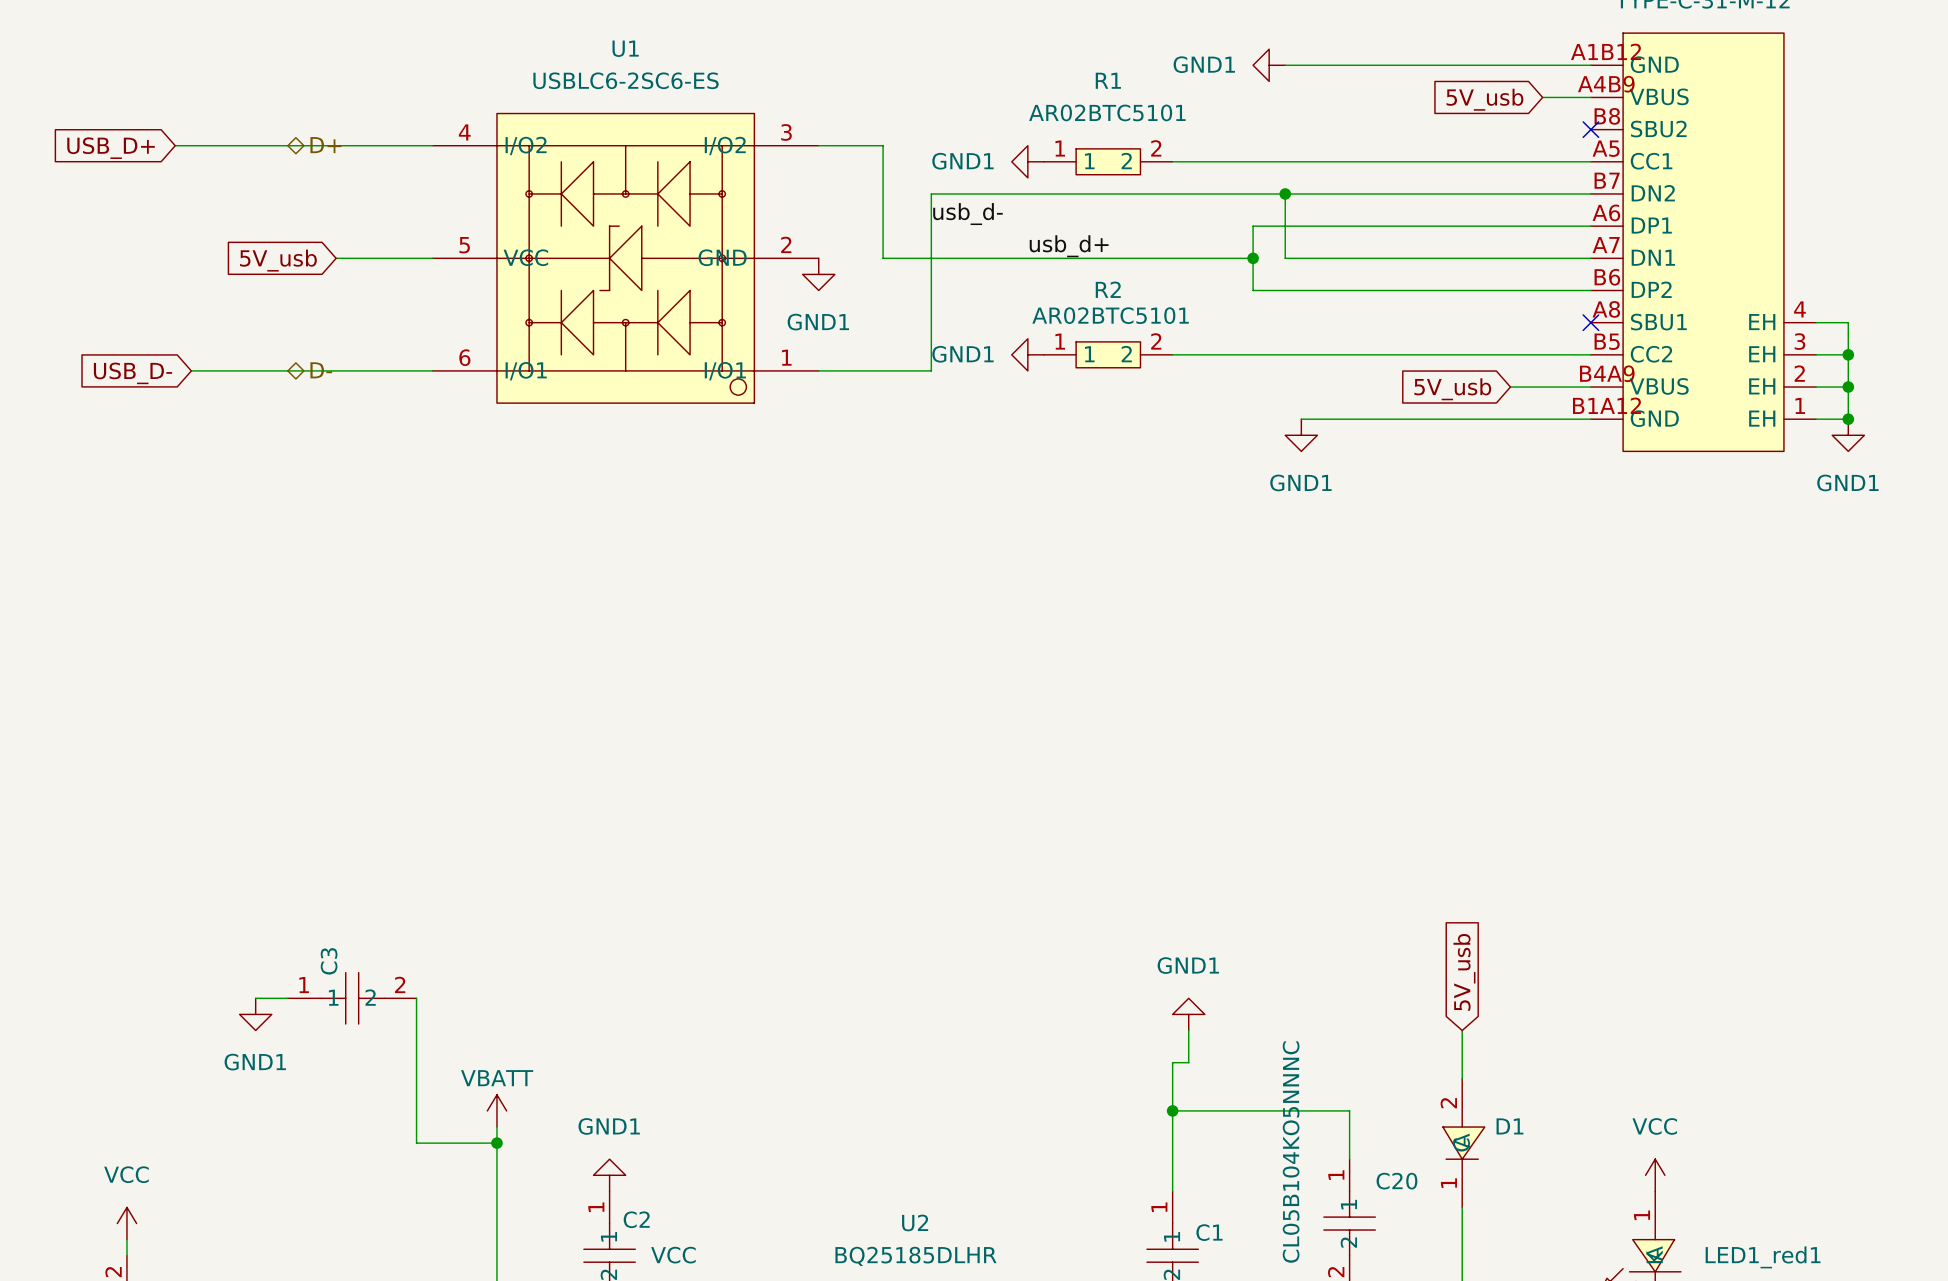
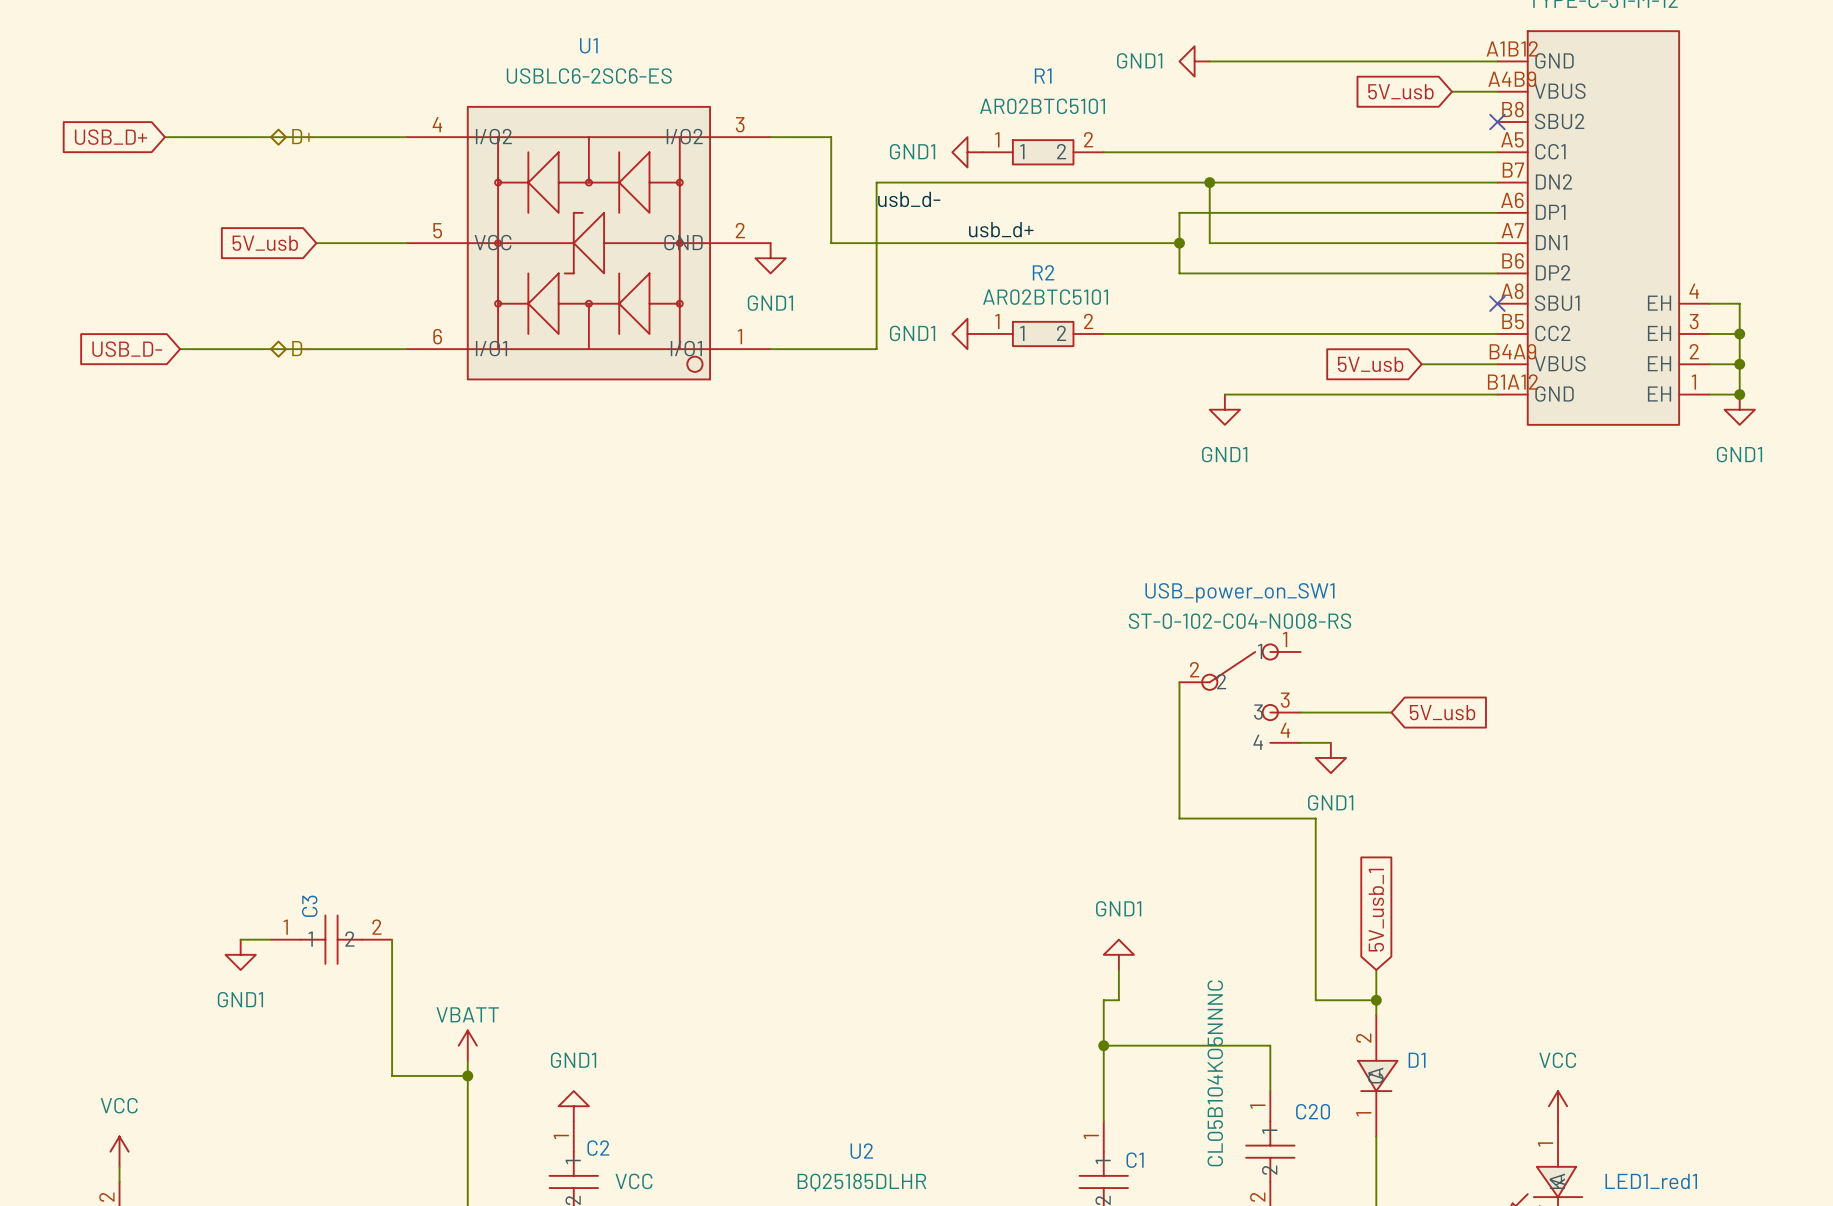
wire: none -> (1179, 682) (1179, 818) (1315, 818) (1315, 1000) (1376, 1000)
USB_power_on_SW1: none -> ST-0-102-C04-N008-RS (1240, 693)
wire: none -> (1300, 712) (1391, 712)
global label: none -> 5V_usb (1442, 712)
wire: none -> (1300, 742) (1330, 742)
power symbol: none -> GND1 (1330, 757)
global label: 5V_usb (1464, 972) -> 5V_usb_1 (1376, 910)
junction: none -> (1376, 1000)

